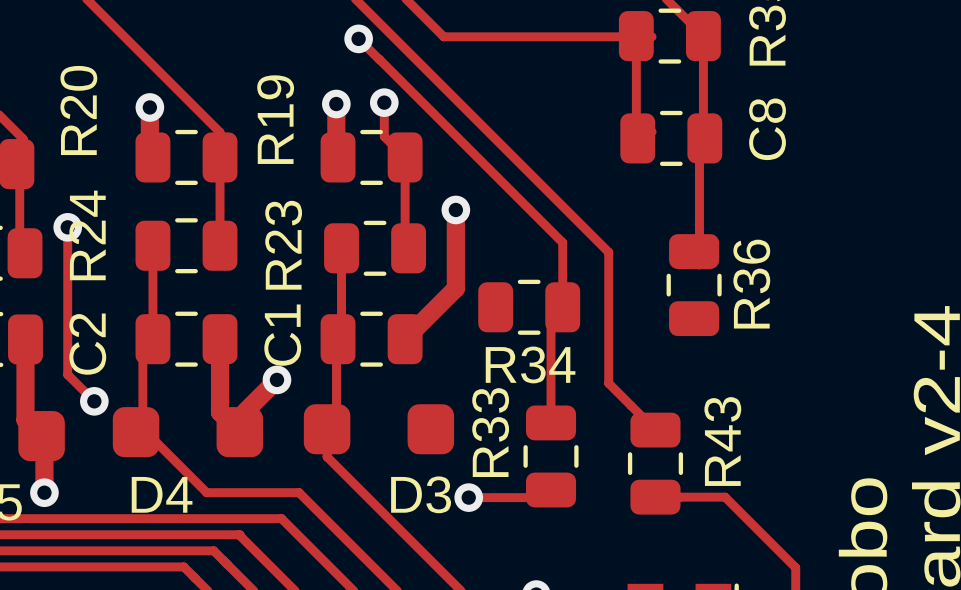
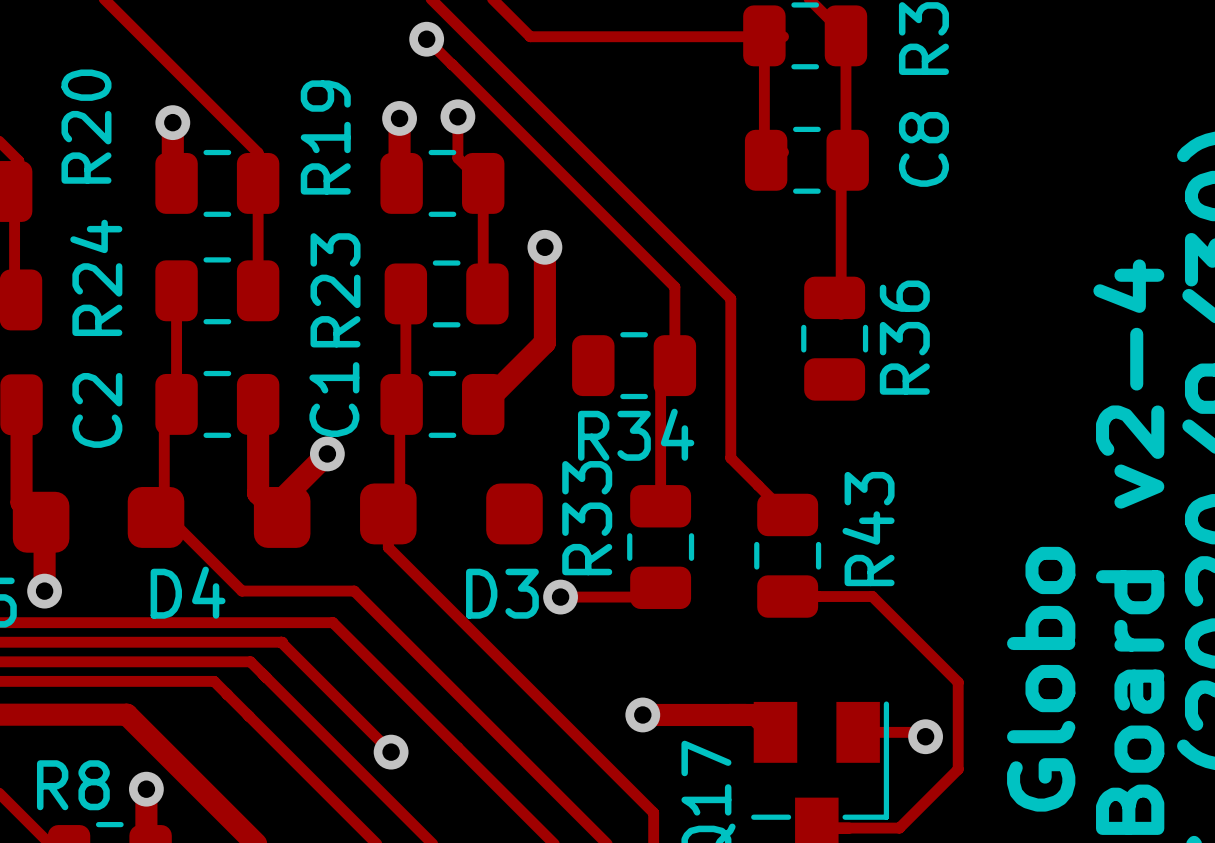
track: (67, 227) (67, 374) (94, 401) -> none
via: (67, 227) -> none
via: (94, 401) -> none

